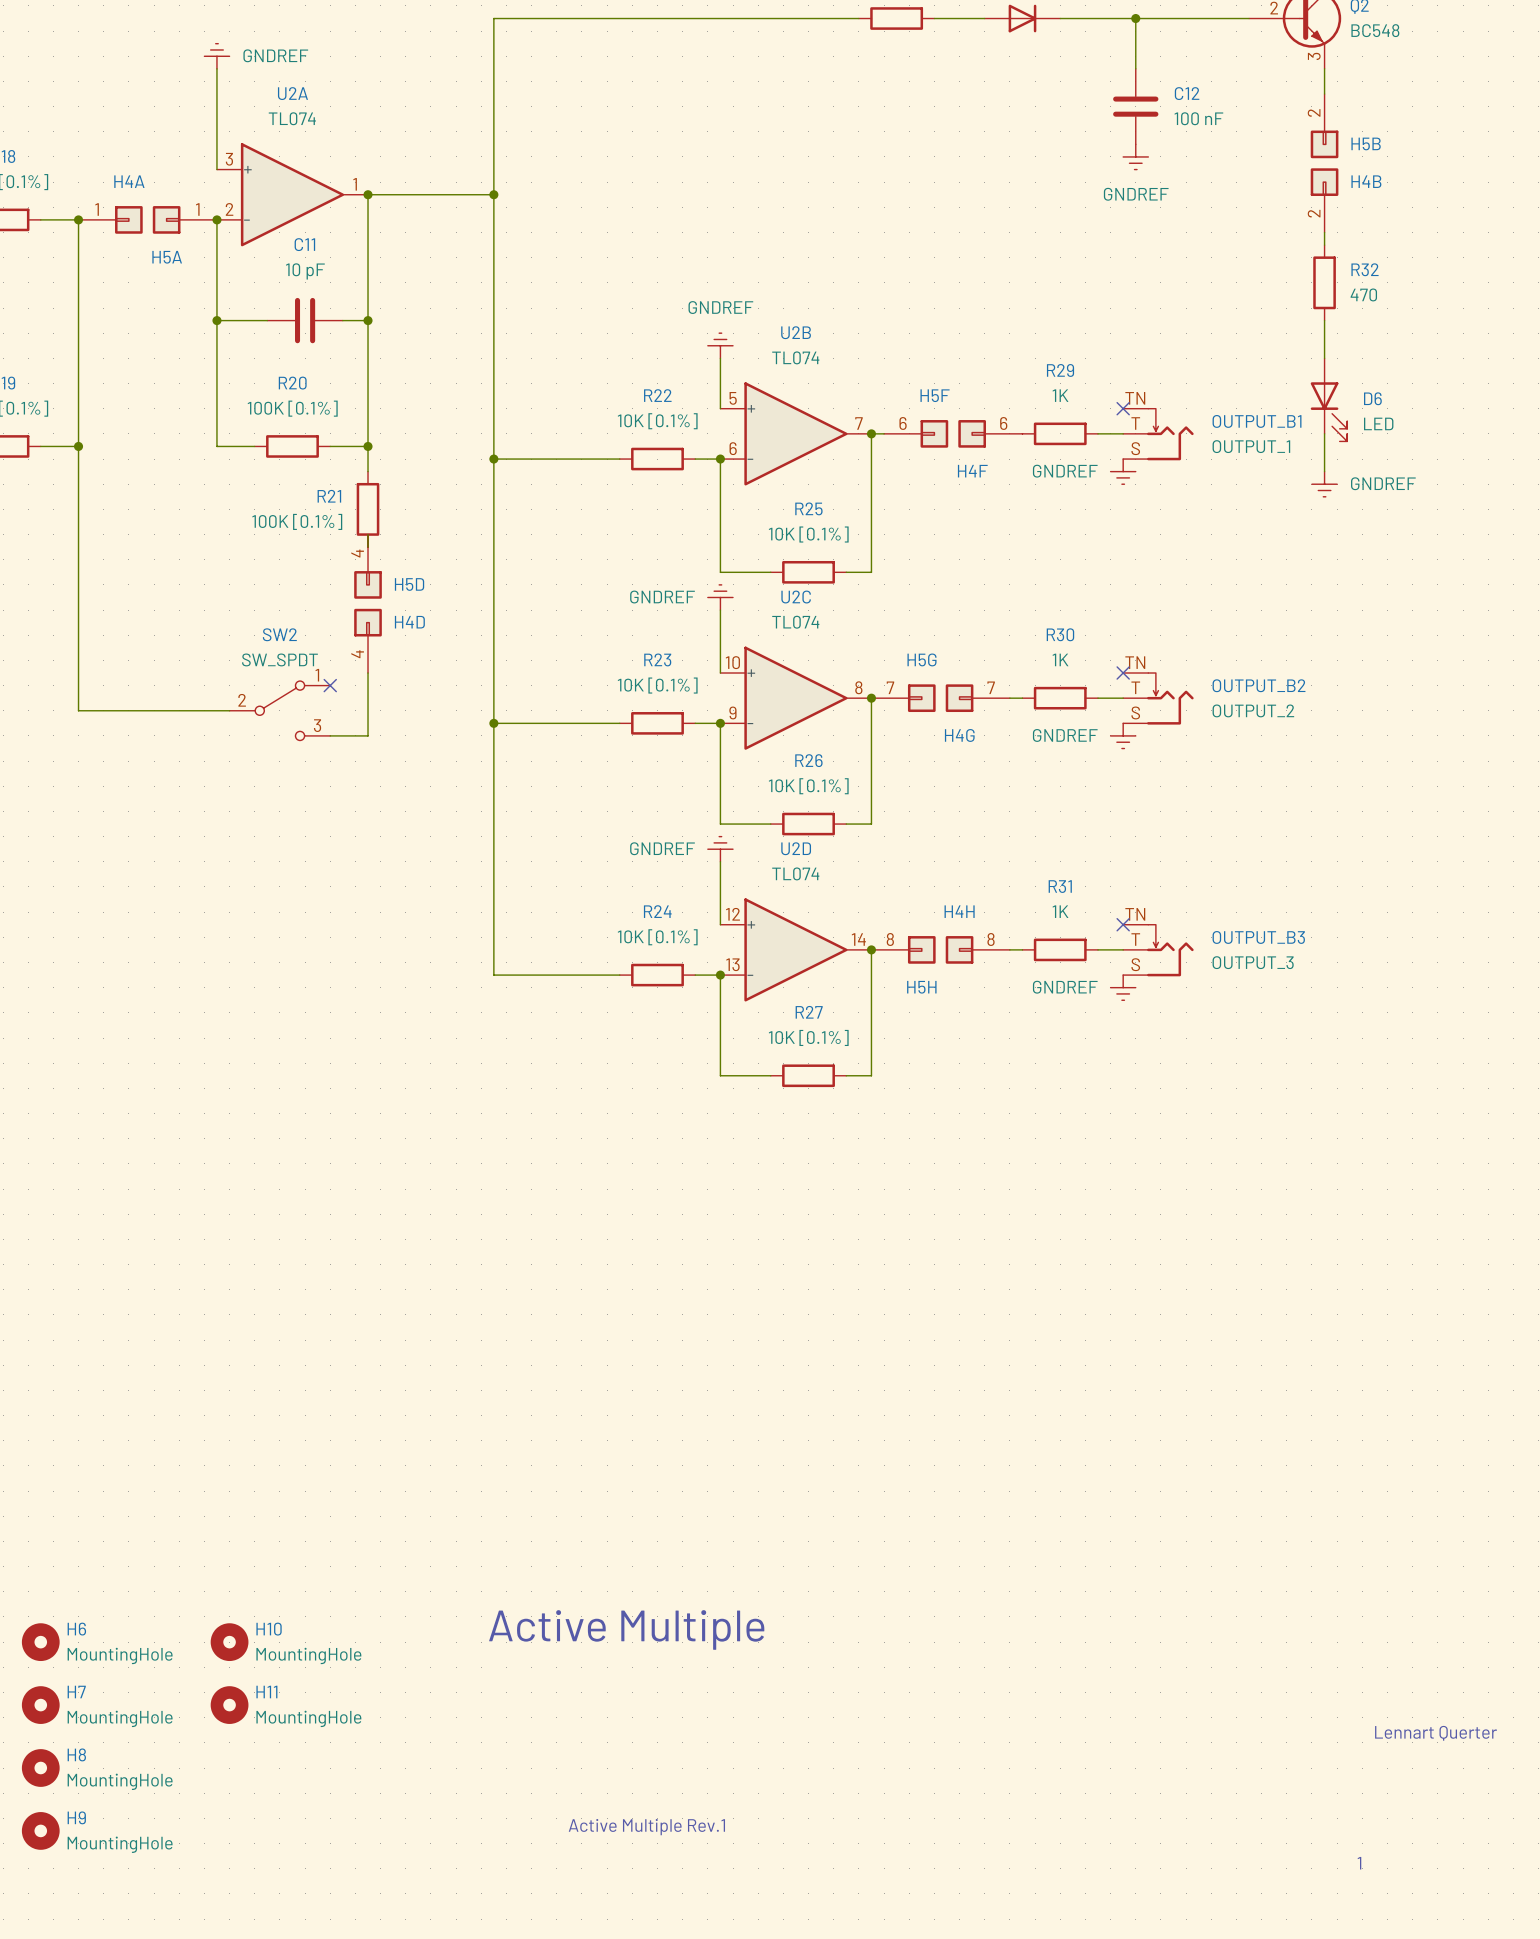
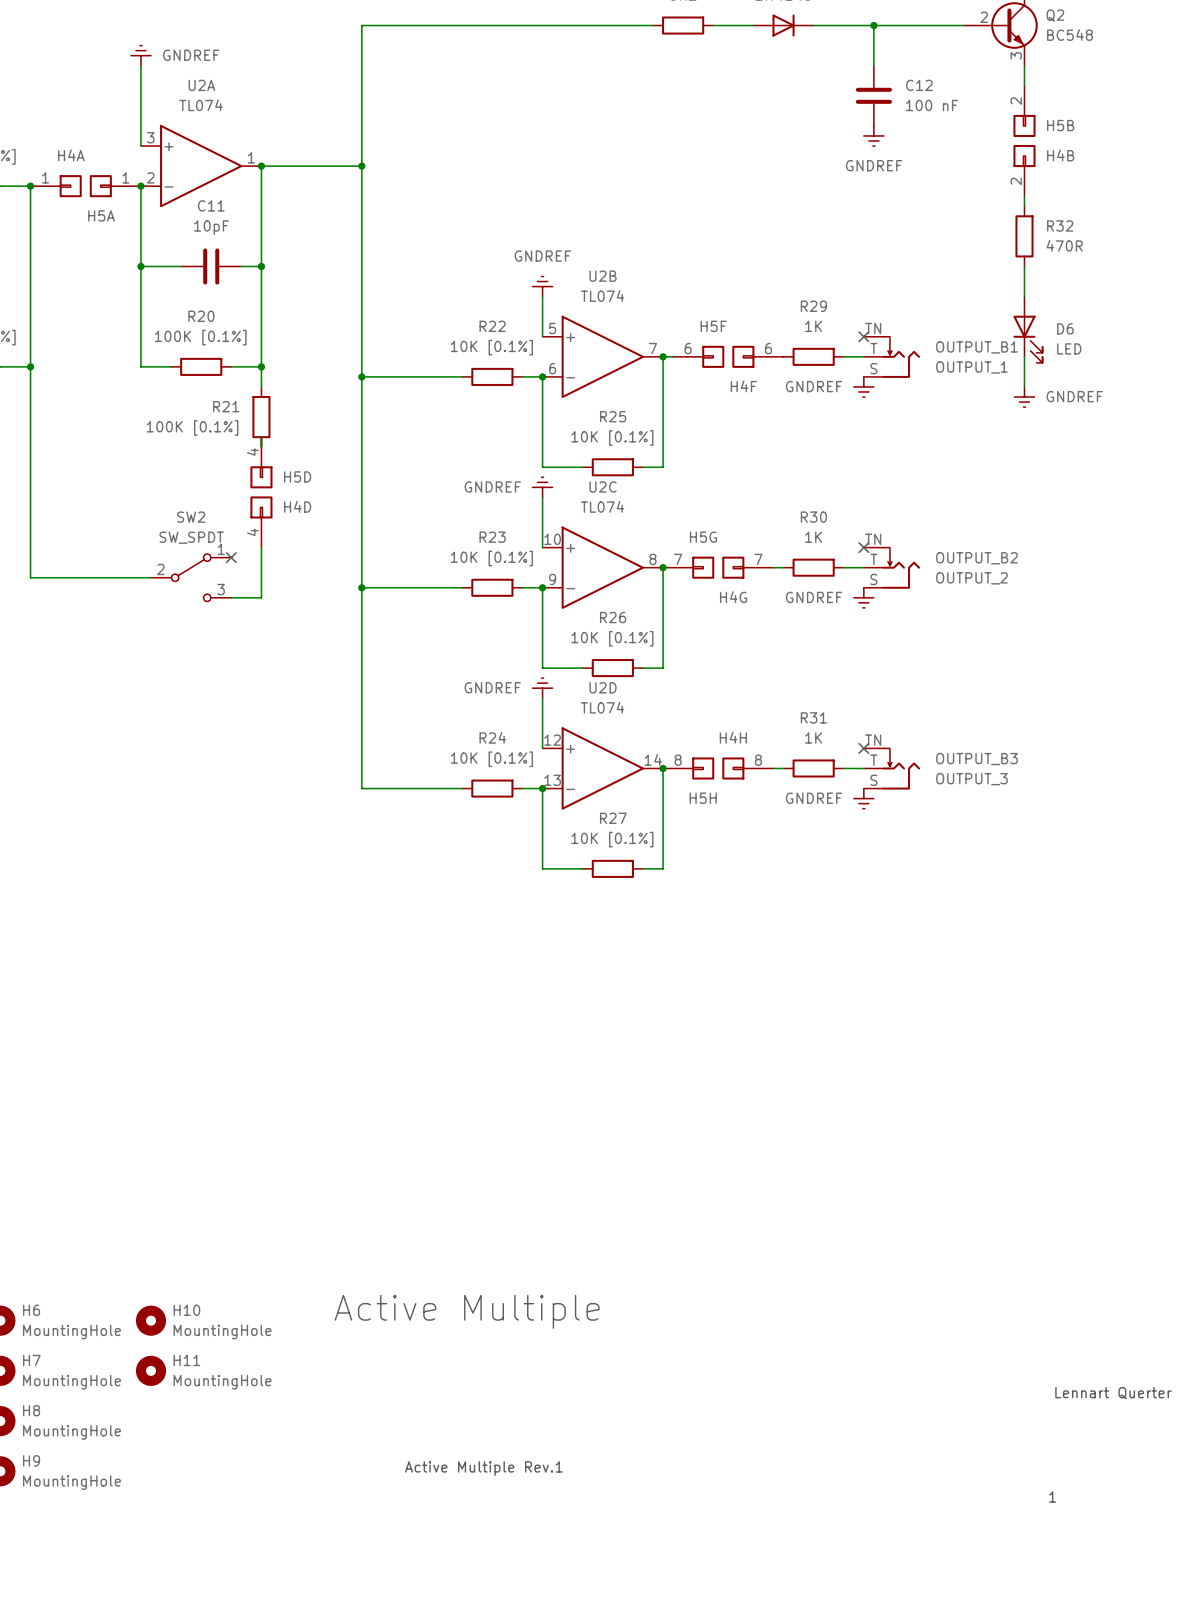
C11 value: 10 pF (305, 271) -> 10pF (211, 227)
R32 value: 470 (1363, 294) -> 470R (1064, 245)

